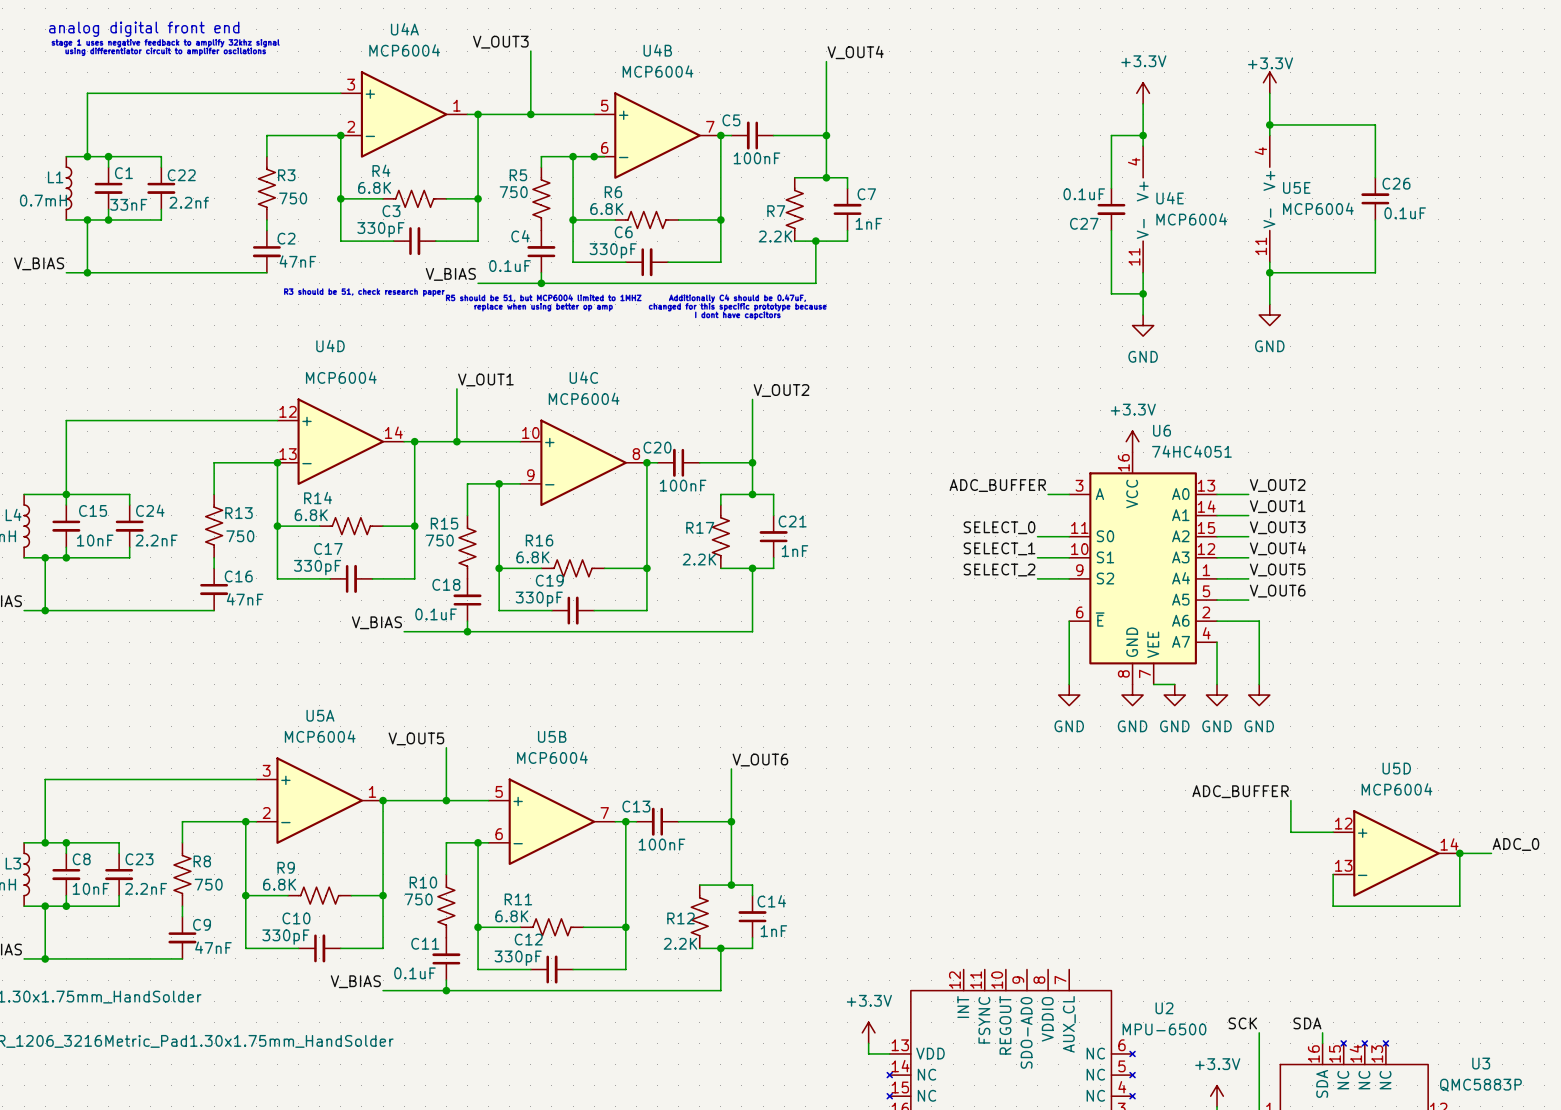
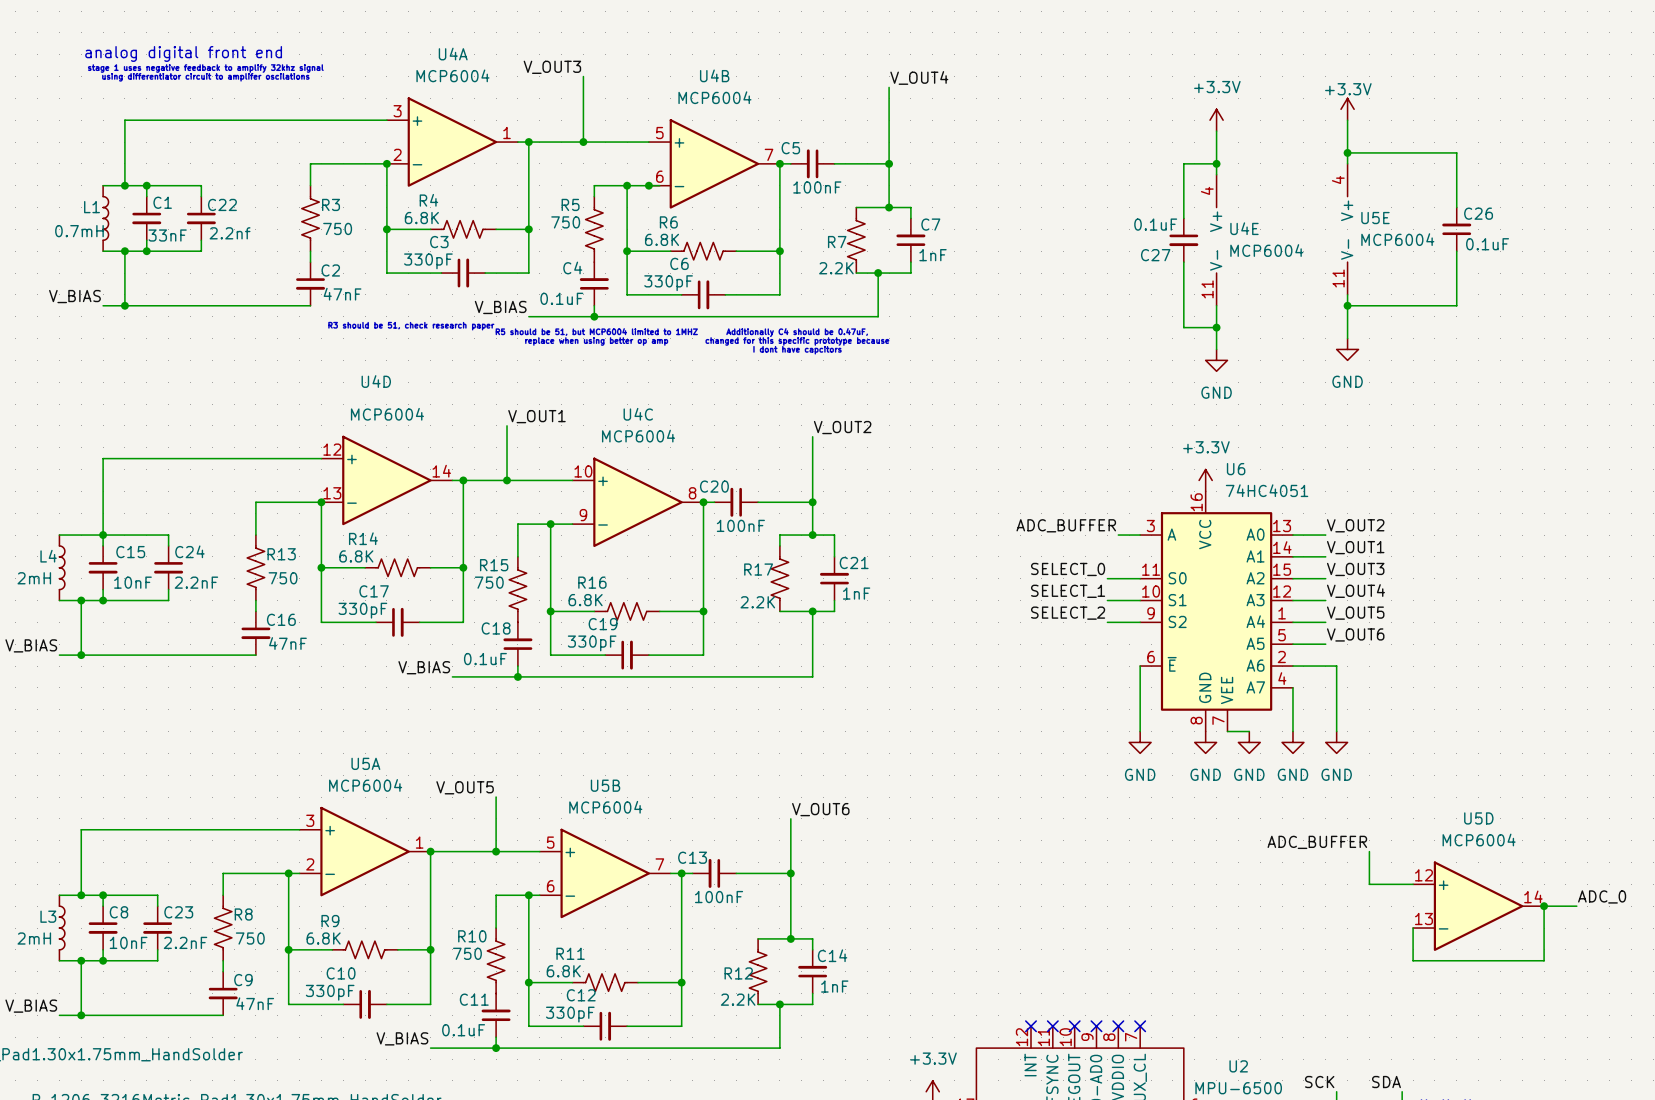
no-connect mark: none -> (1030, 1026)
no-connect mark: none -> (1052, 1026)
no-connect mark: none -> (1074, 1026)
no-connect mark: none -> (1096, 1026)
no-connect mark: none -> (1118, 1026)
no-connect mark: none -> (1140, 1026)

